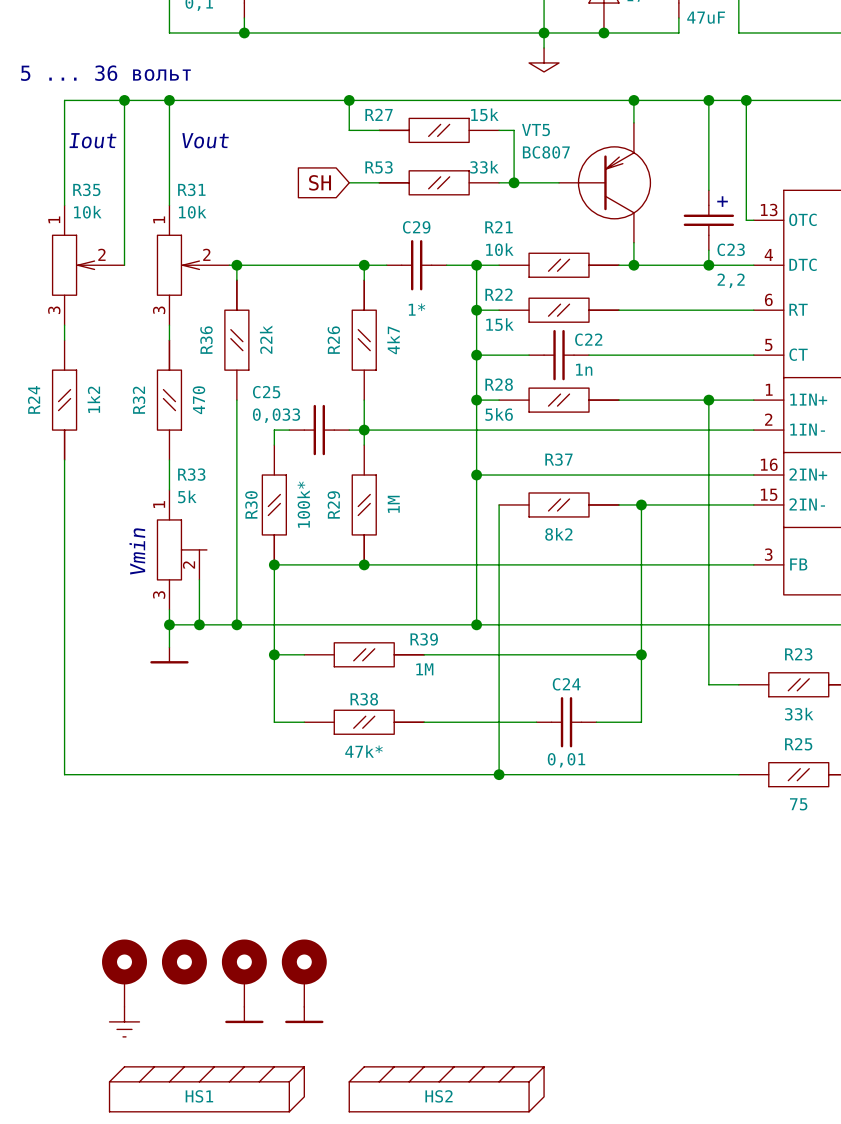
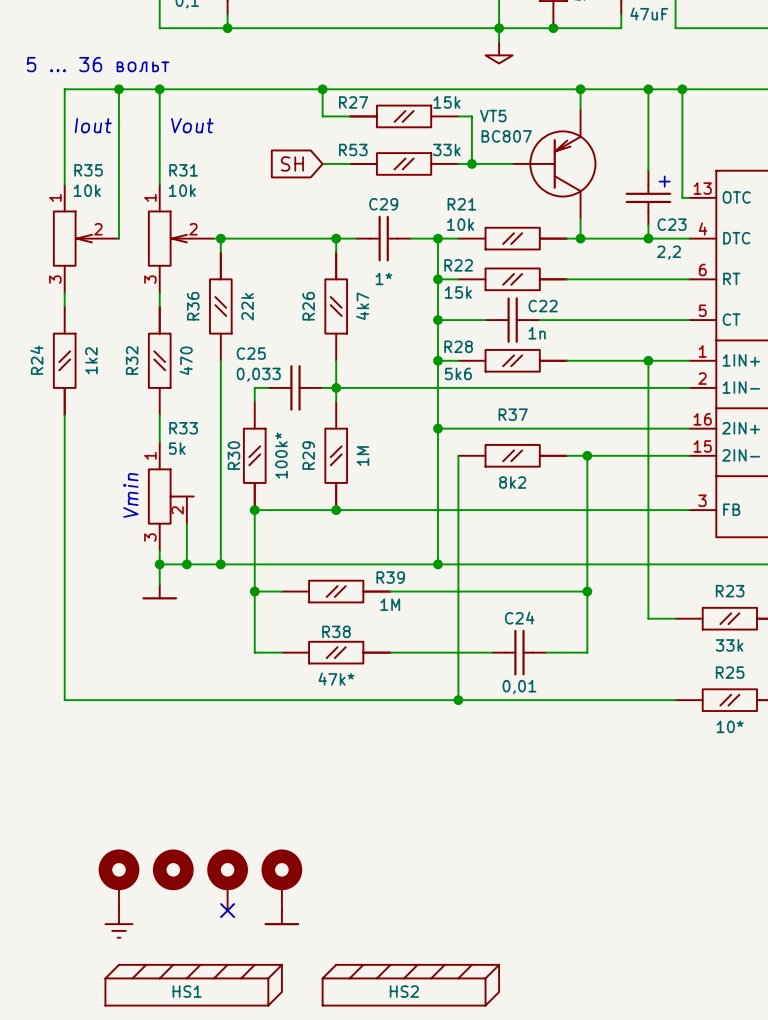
R25 value: 75 (798, 804) -> 10* (730, 726)
no-connect mark: none -> (227, 910)
power symbol: (244, 1015) -> none

